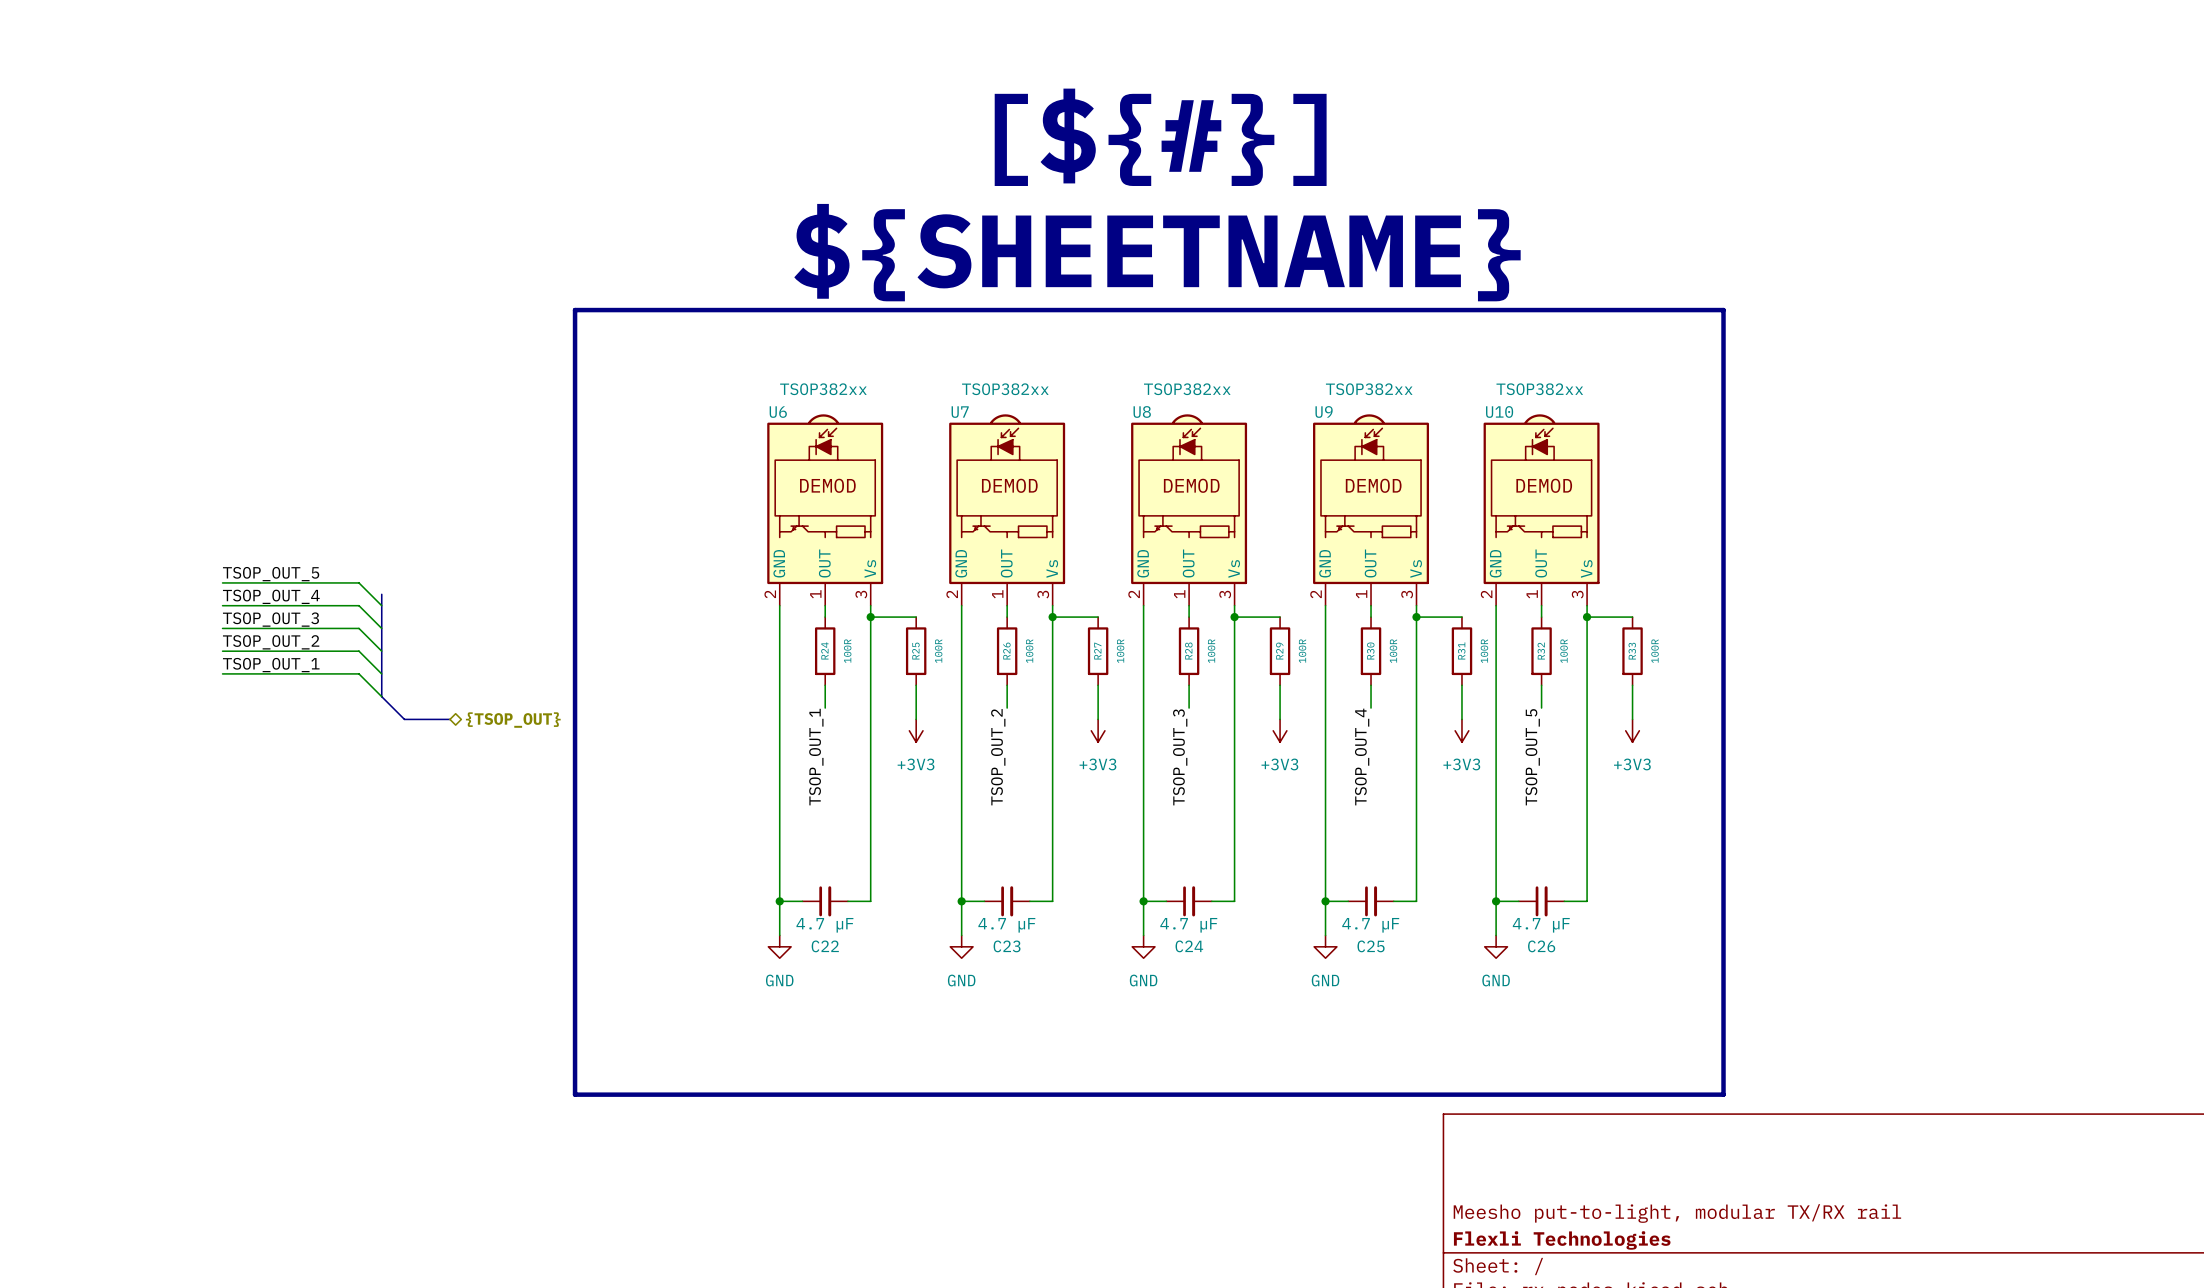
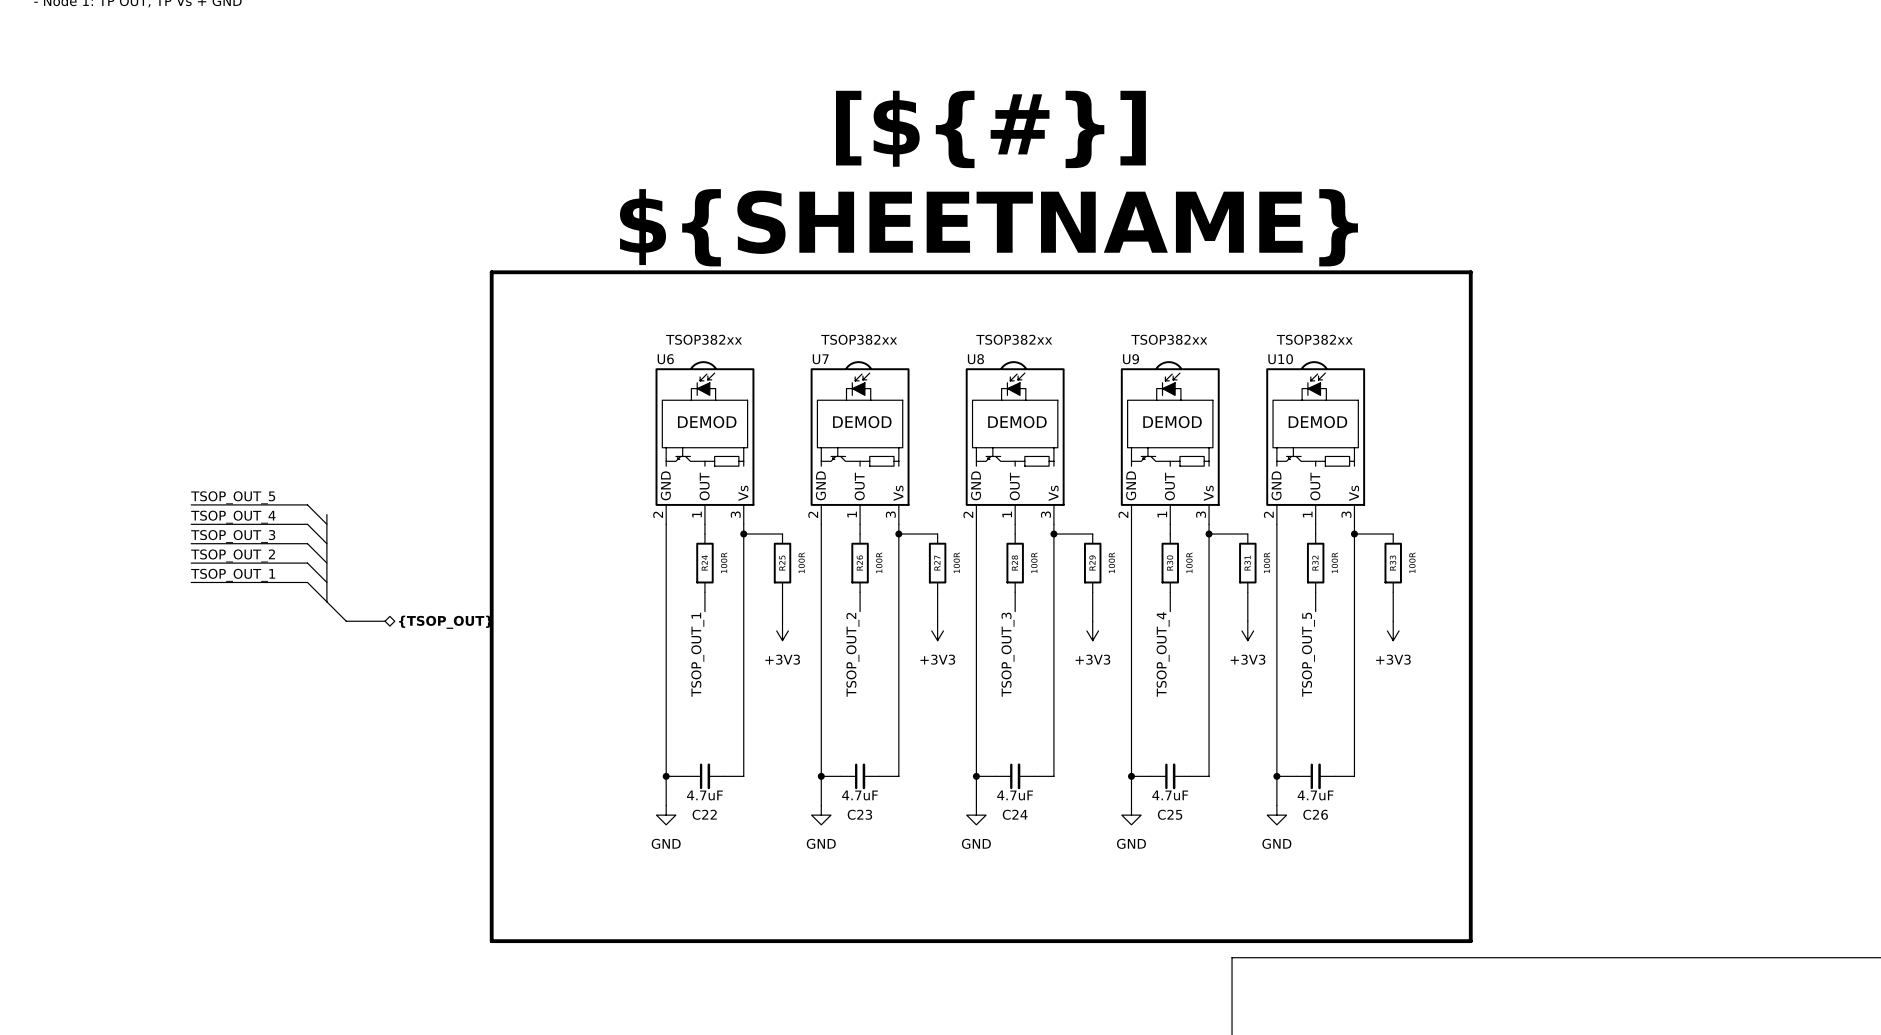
C22 value: 4.7 µF (824, 925) -> 4.7uF (704, 795)
C23 value: 4.7 µF (1006, 925) -> 4.7uF (860, 795)
C24 value: 4.7 µF (1188, 925) -> 4.7uF (1015, 795)
C25 value: 4.7 µF (1370, 925) -> 4.7uF (1170, 795)
C26 value: 4.7 µF (1541, 925) -> 4.7uF (1315, 795)

